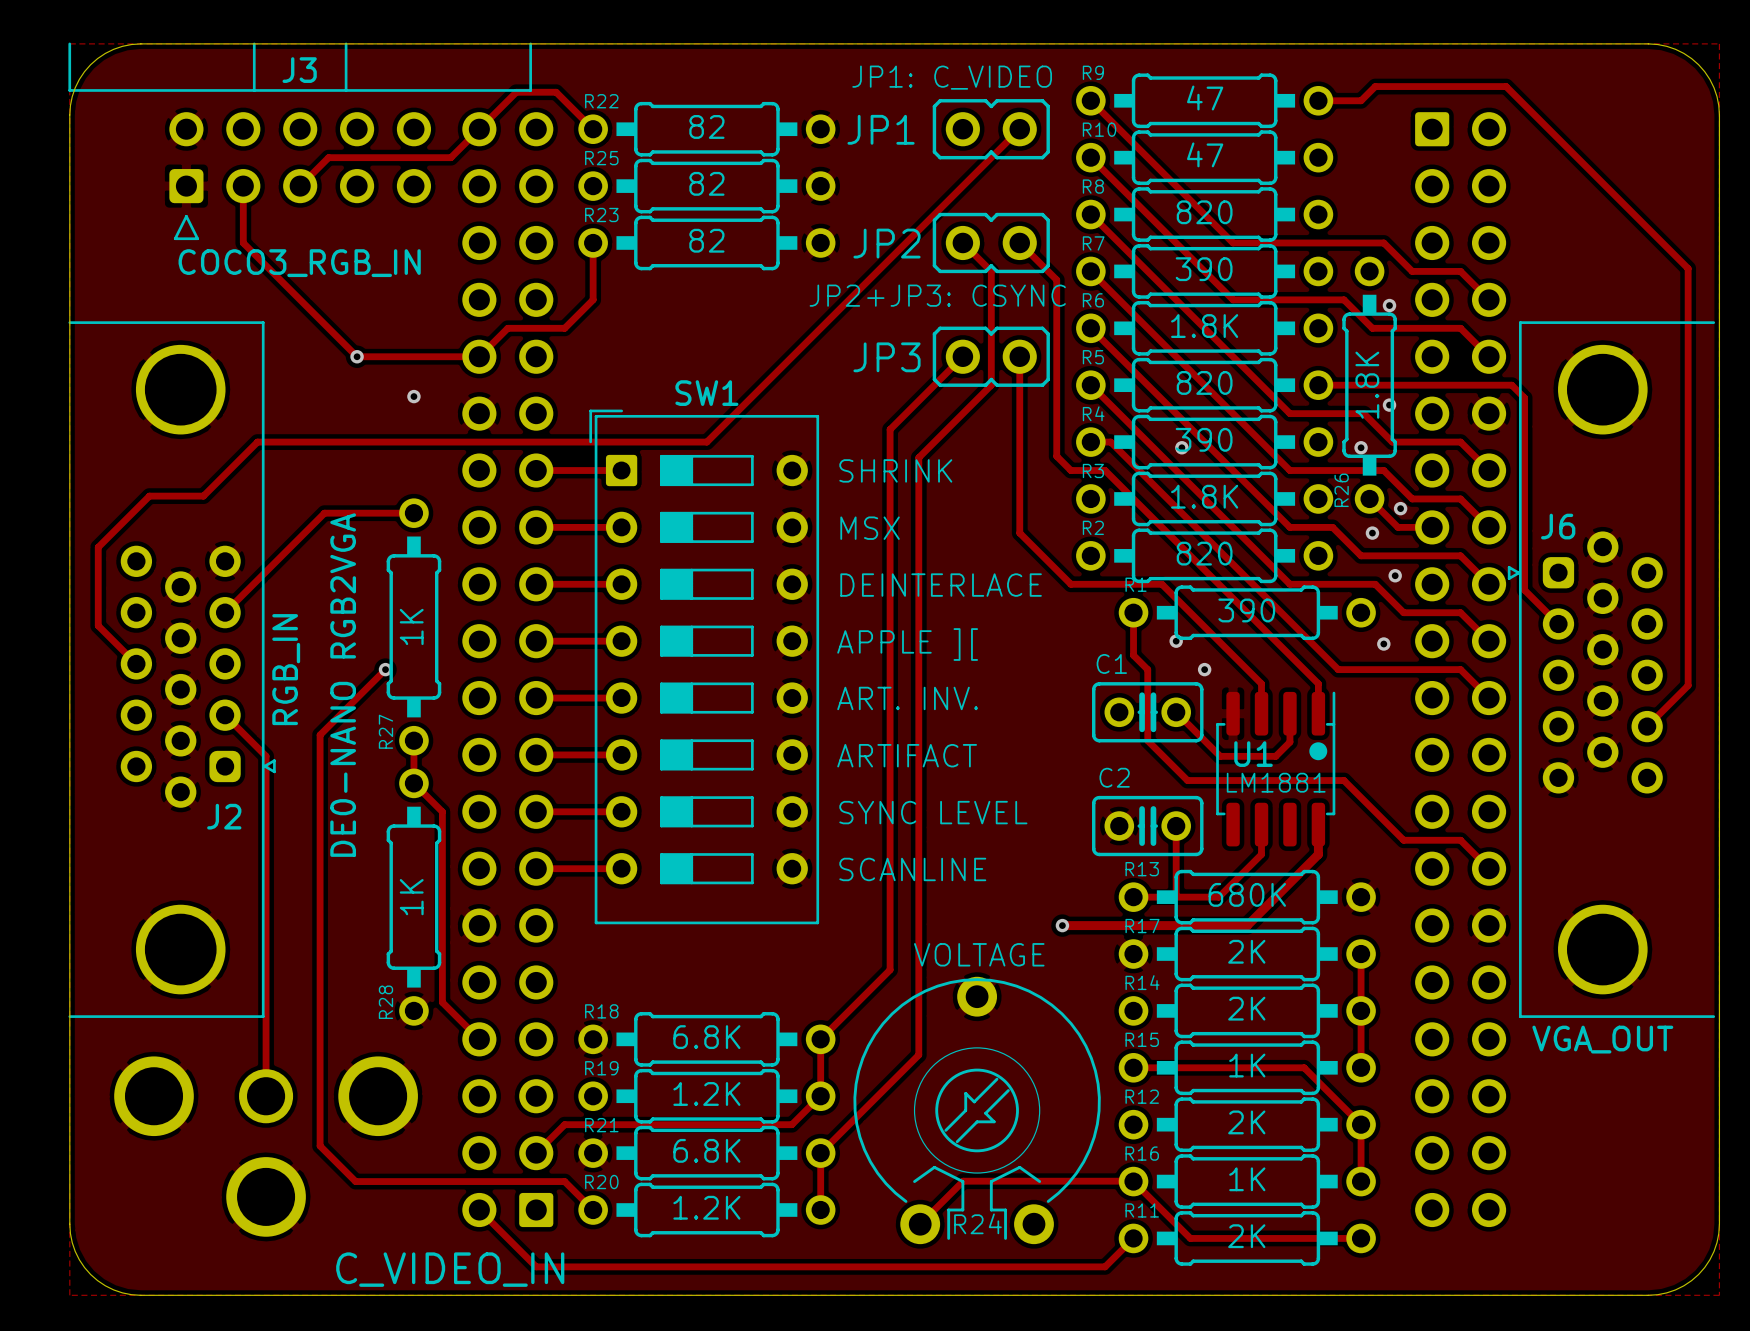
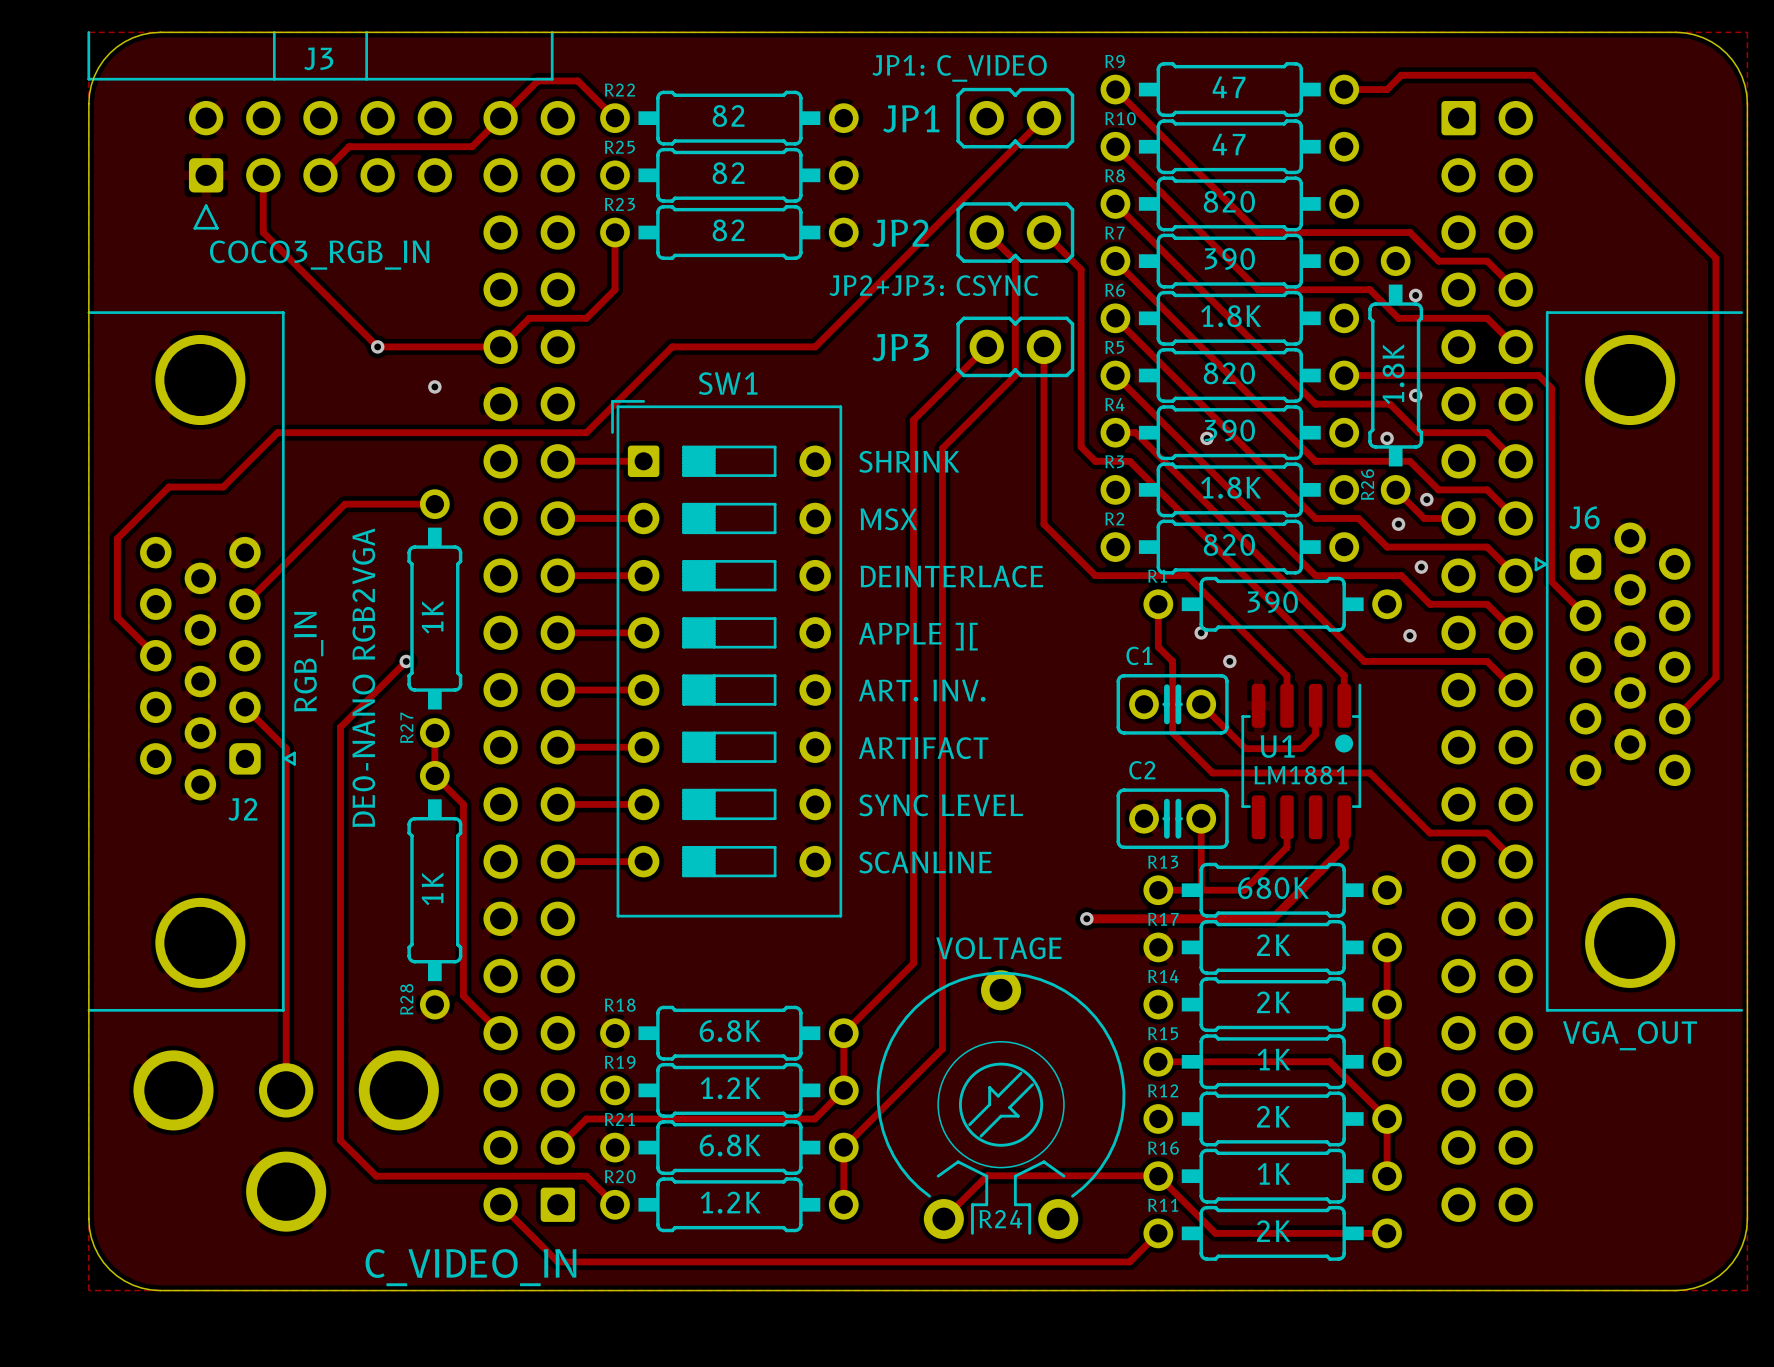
track: (792, 356) (706, 442) (564, 442) -> (815, 346) (672, 346) (586, 432)

